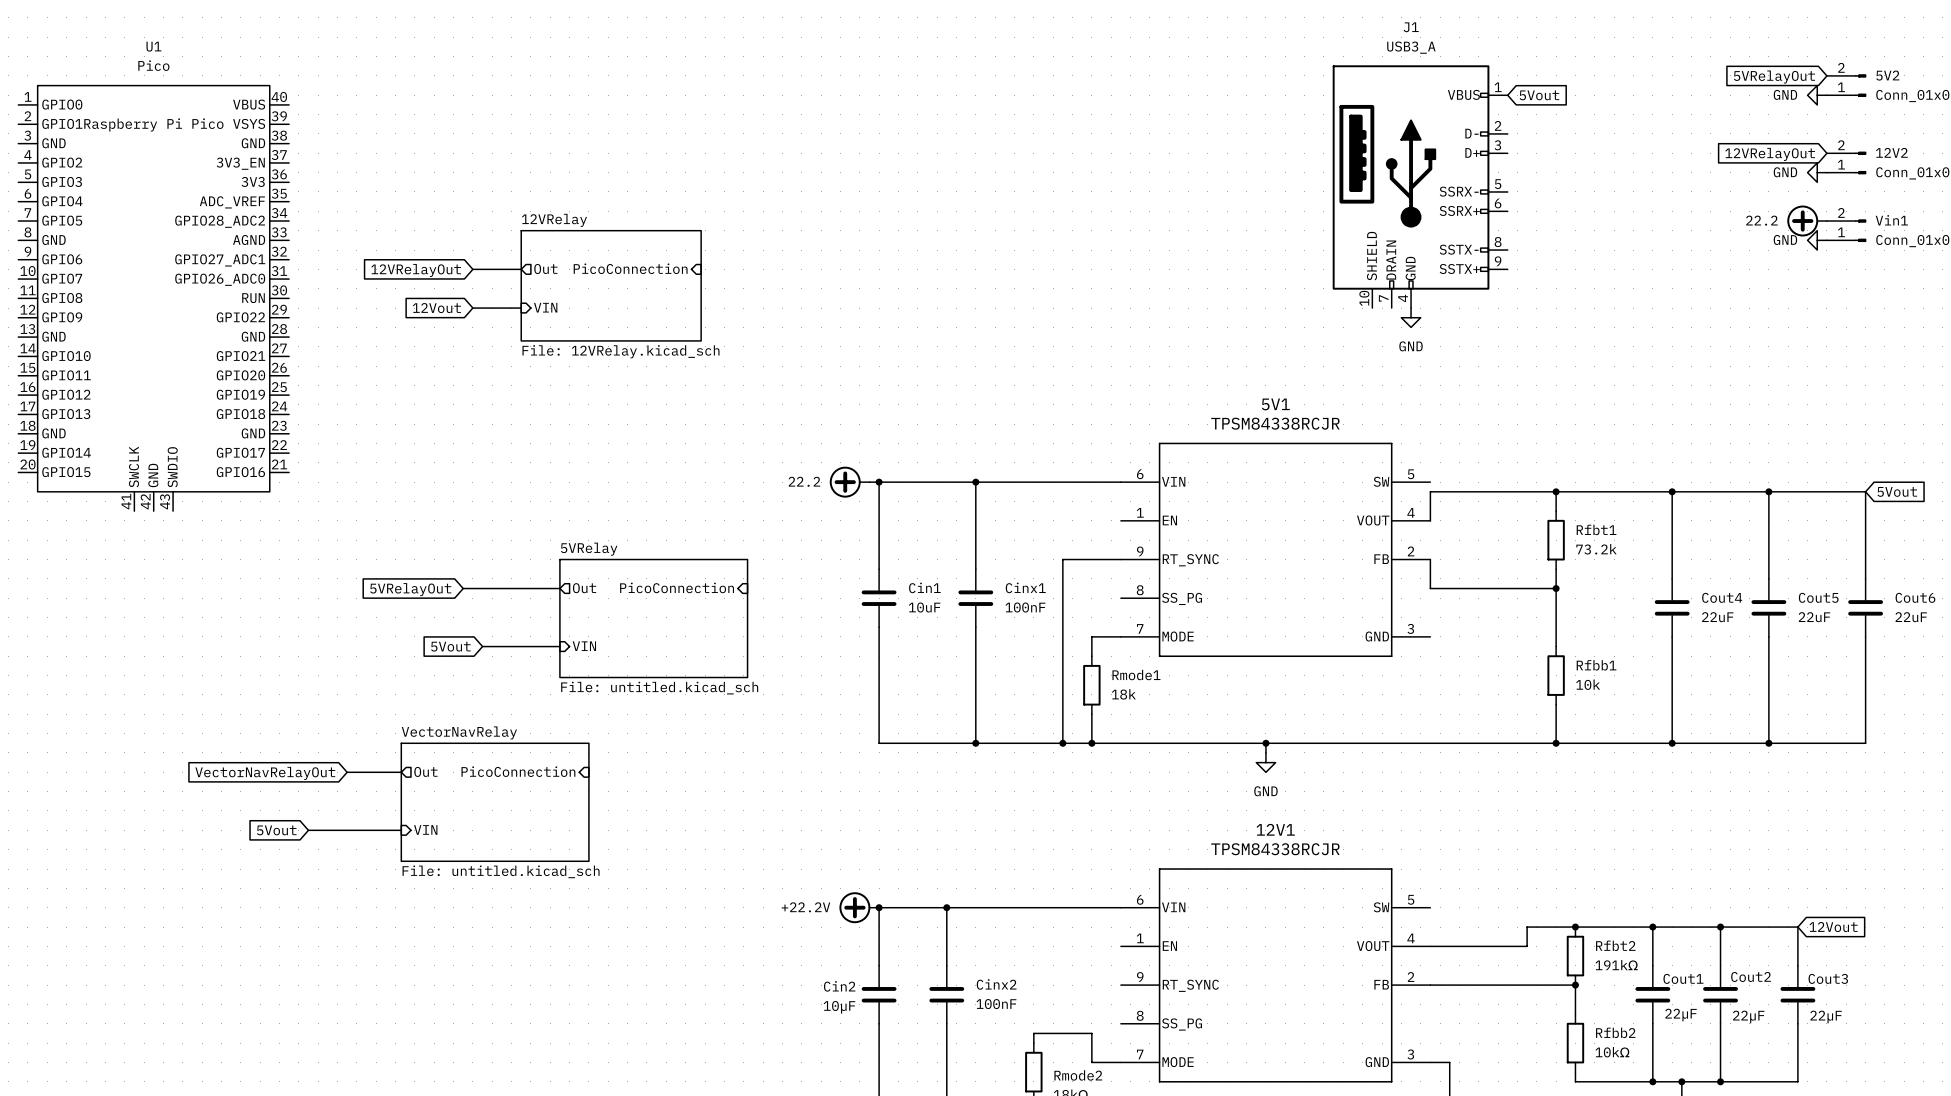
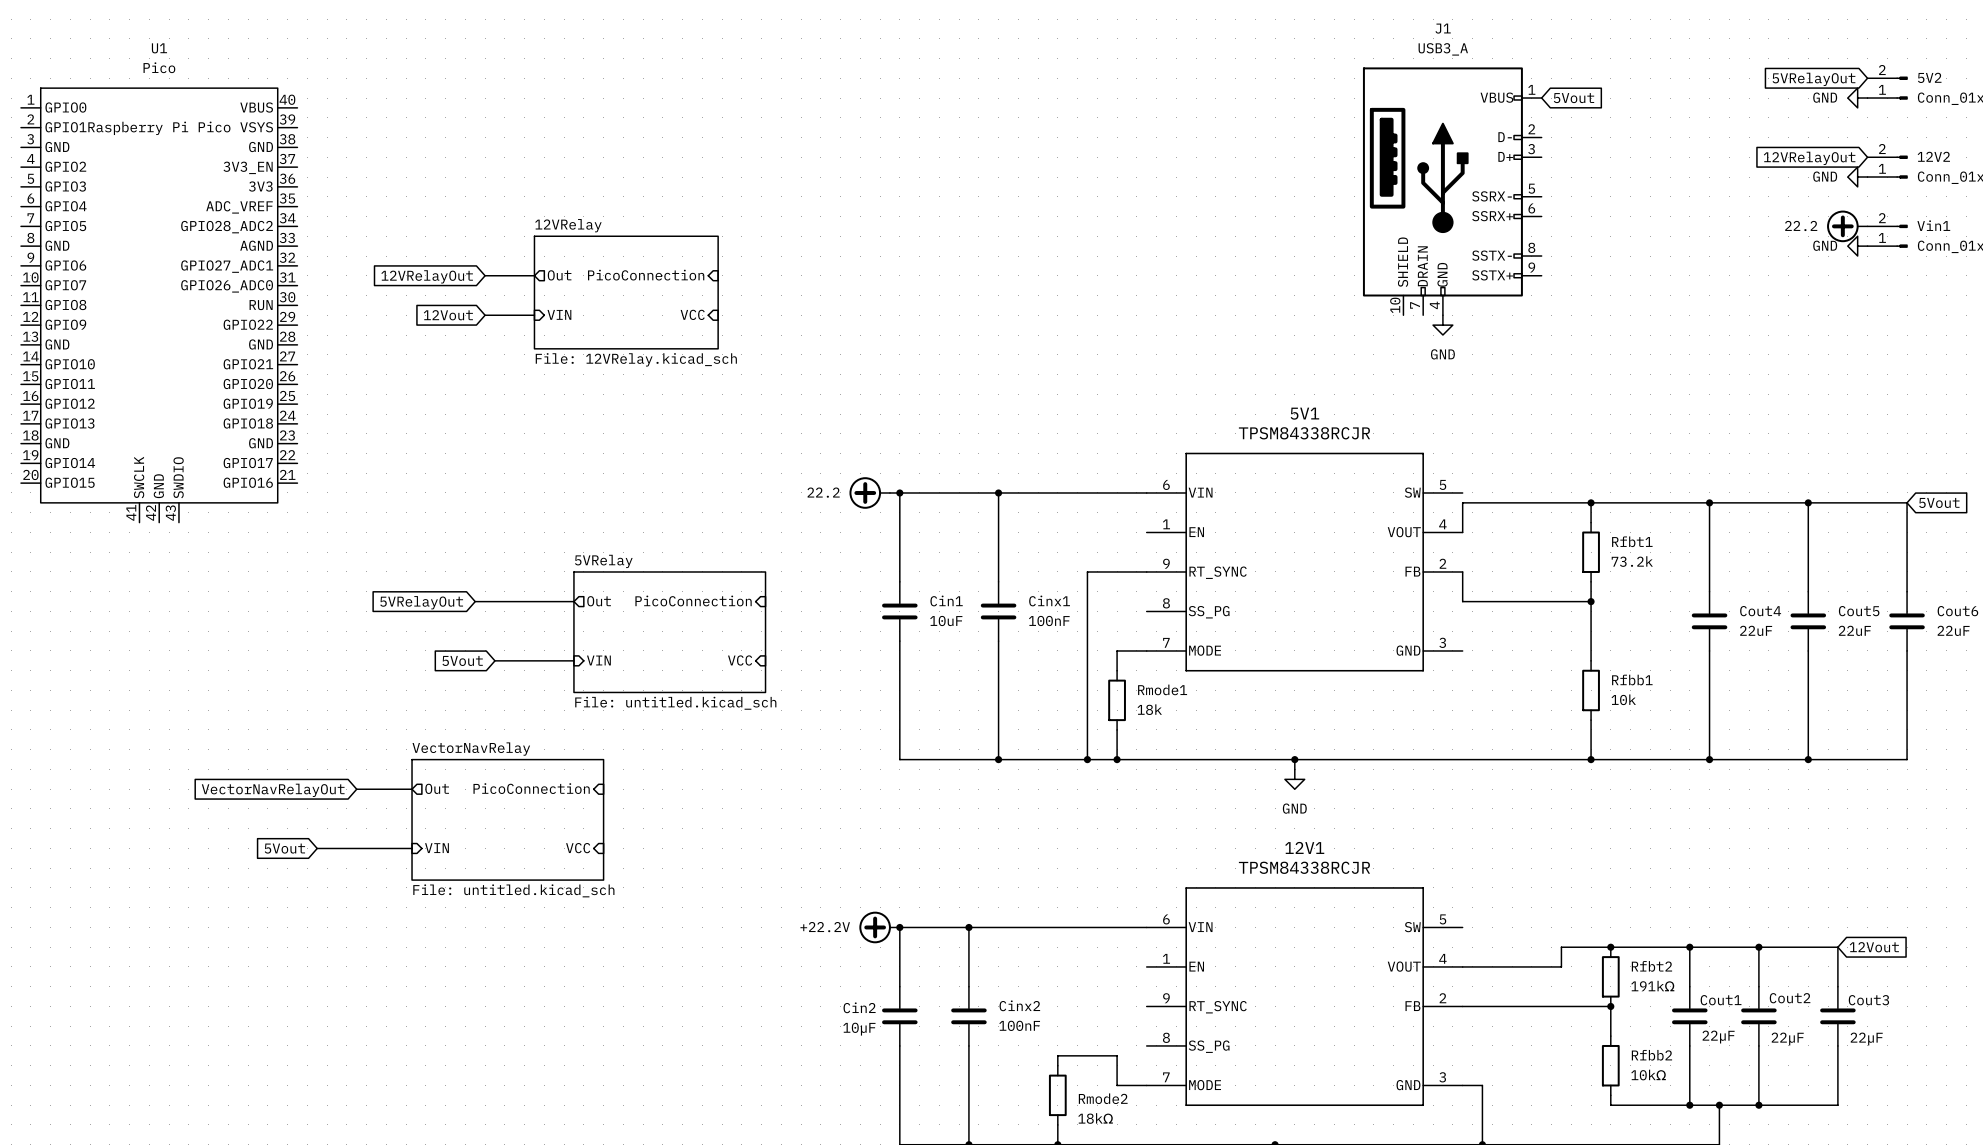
sheet pin: none -> VCC (692, 314)
sheet pin: none -> VCC (740, 660)
sheet pin: none -> VCC (578, 848)

